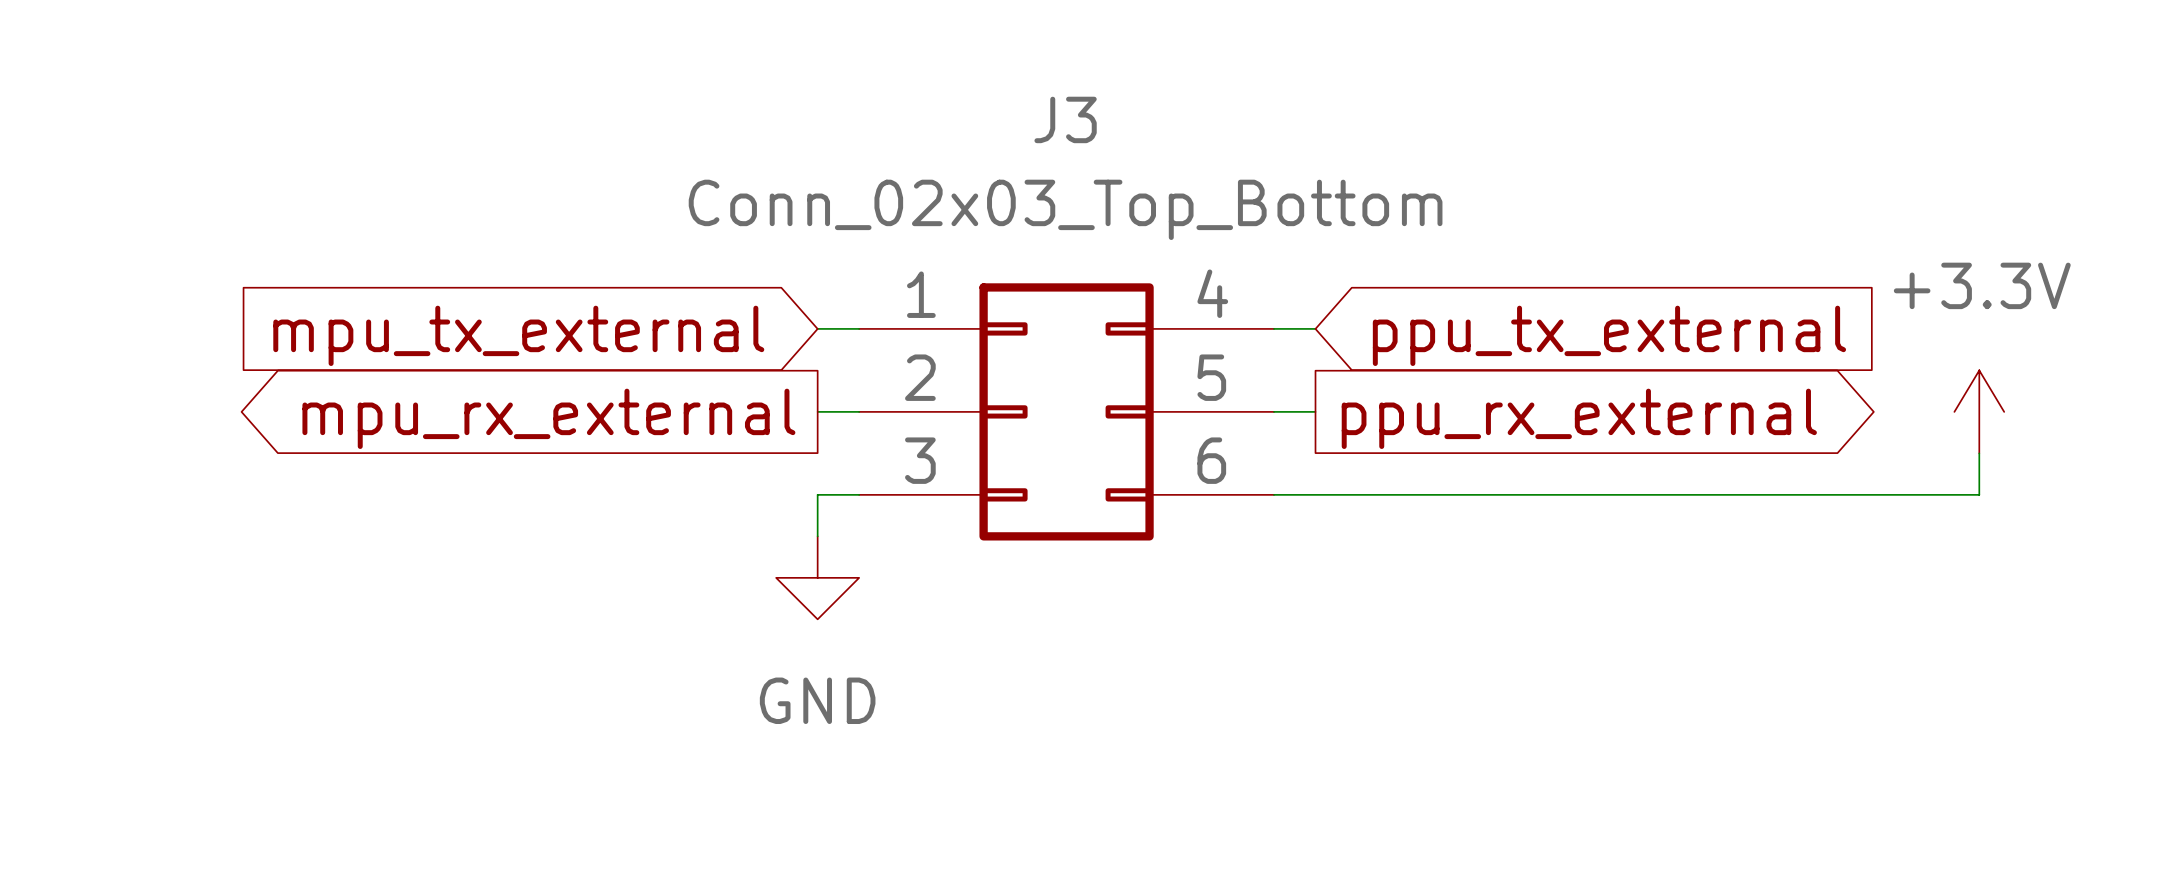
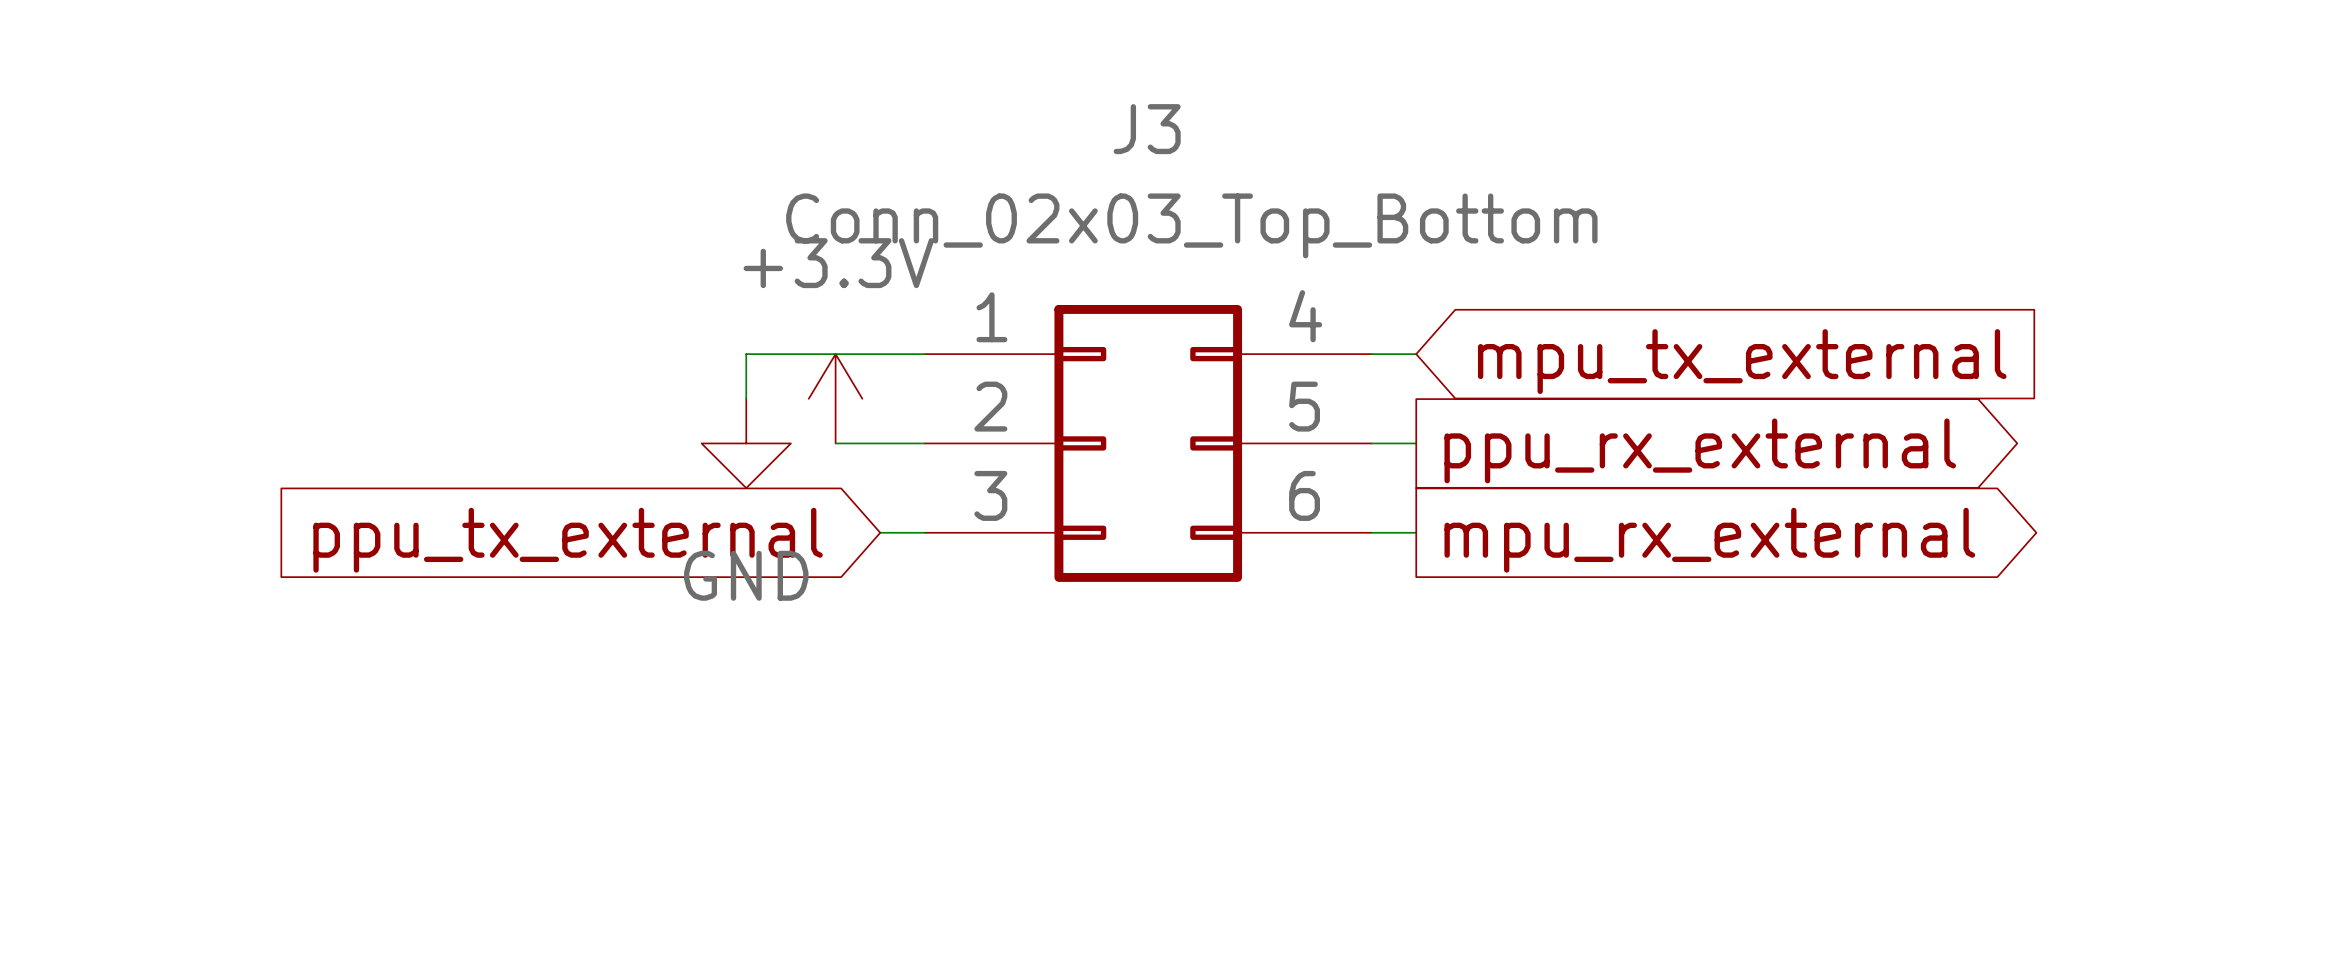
J3 value position: Conn_02x03_Top_Bottom (1065, 209) -> Conn_02x03_Top_Bottom (1191, 225)
wire: none -> (880, 354) (746, 354) (746, 398)
global label: mpu_tx_external (518, 335) -> none
global label: ppu_tx_external (1609, 335) -> mpu_tx_external (1742, 361)
power symbol: none -> +3.3V (835, 398)
wire: none -> (835, 443) (880, 443)
power symbol: +3.3V (1979, 411) -> none
global label rotation: 0° (548, 418) -> 180° (1709, 540)
global label position: mpu_rx_external (548, 418) -> mpu_rx_external (1709, 540)
wire: (1979, 453) (1979, 494) (1315, 494) -> none
wire: (817, 494) (817, 536) -> none
global label: none -> ppu_tx_external (568, 540)
power symbol position: GND (817, 577) -> GND (746, 443)

